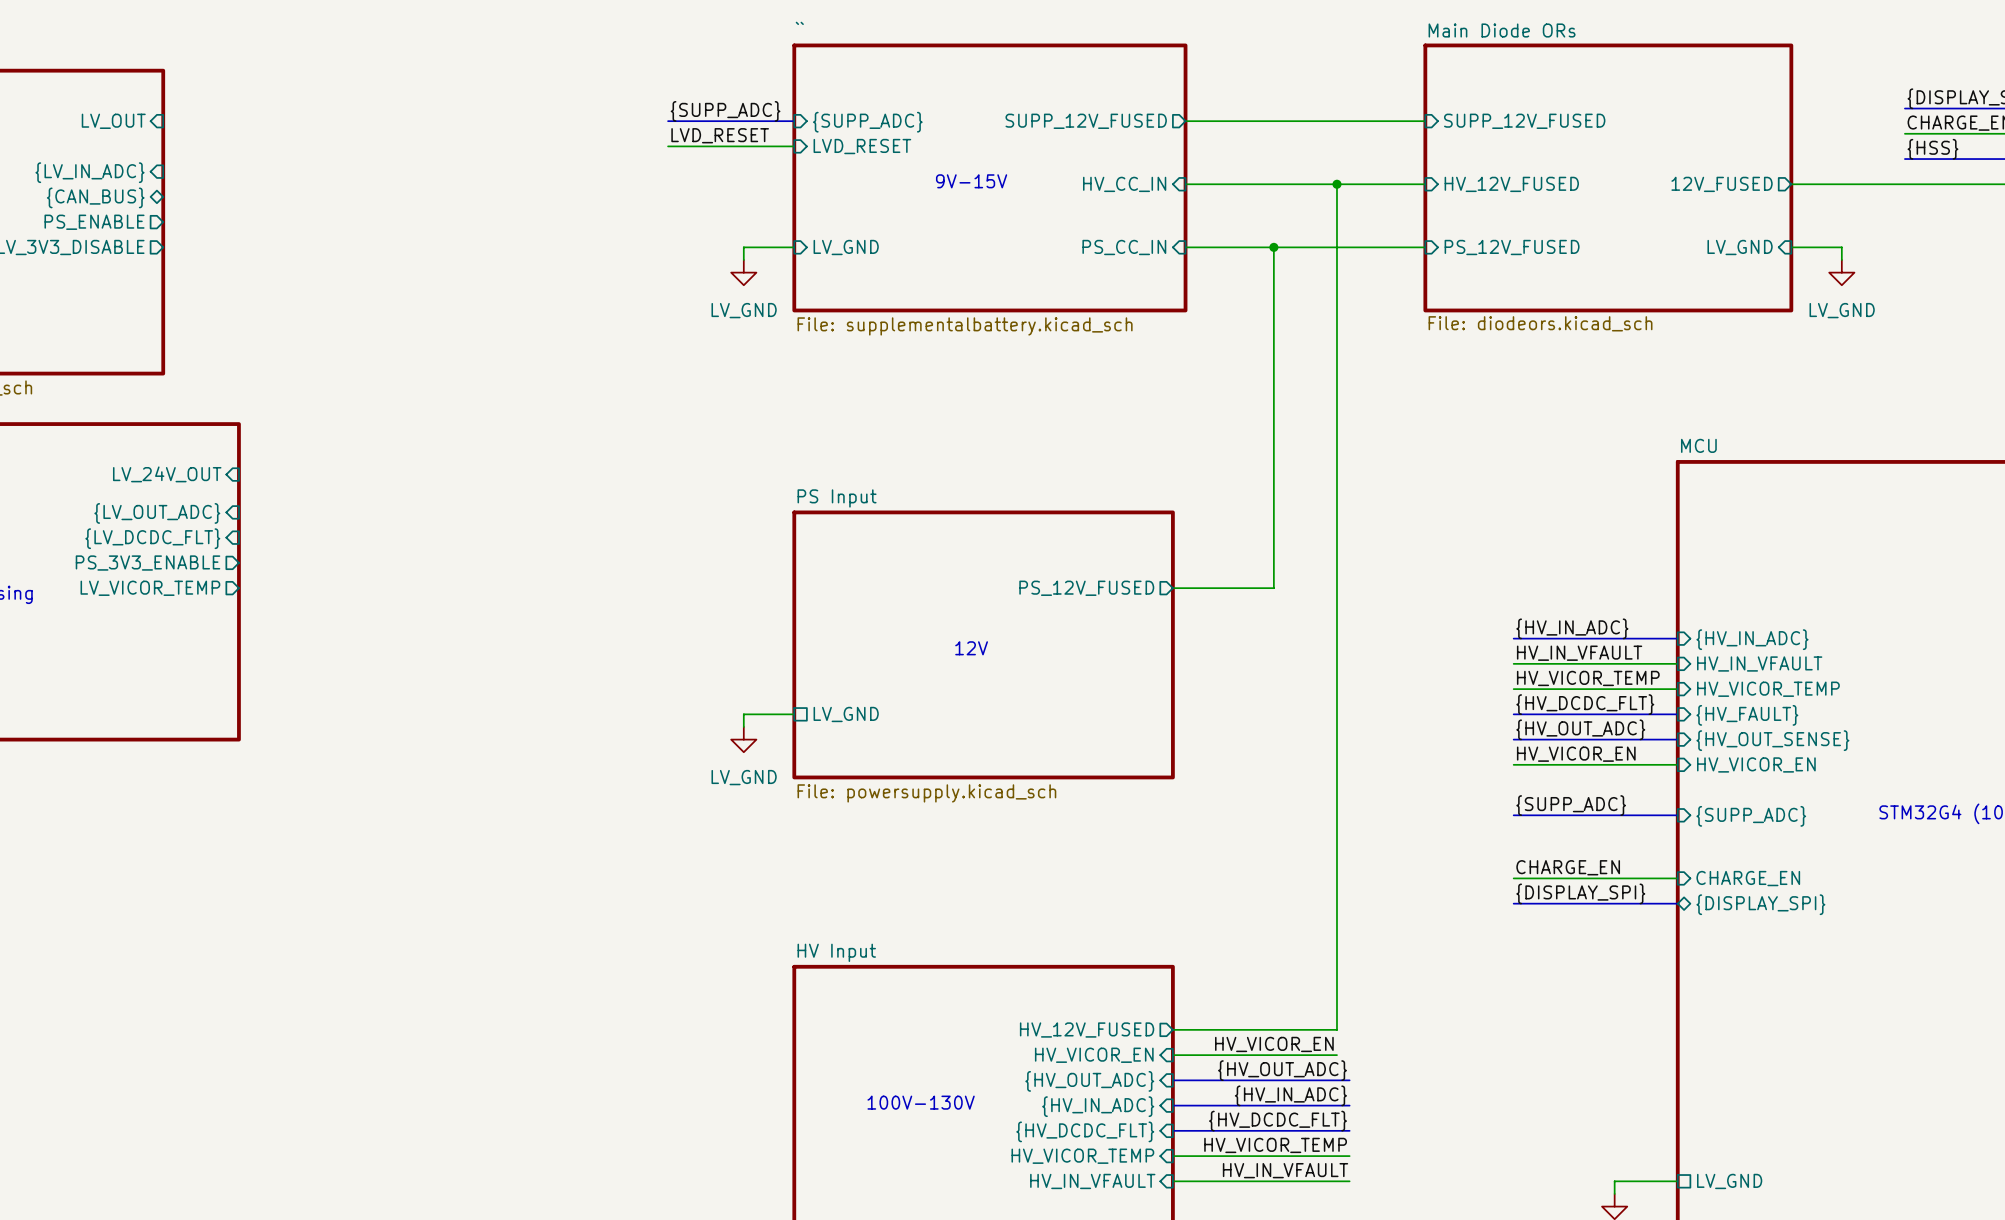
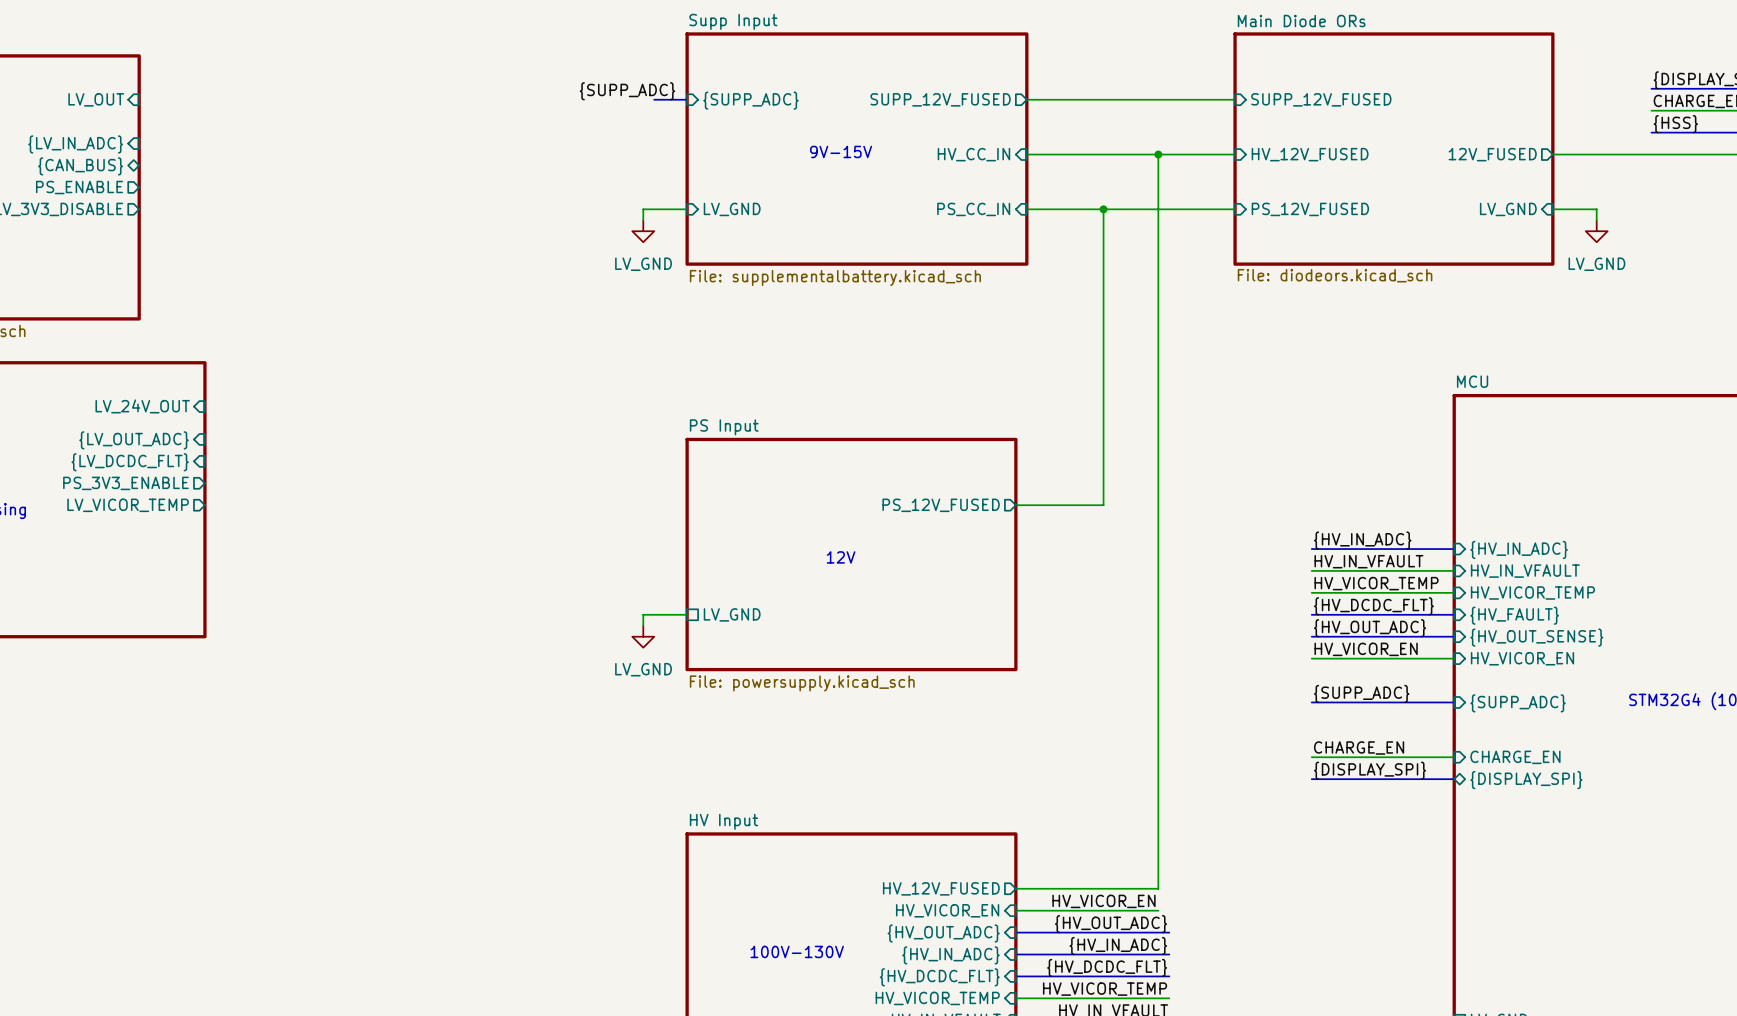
sheet Supp Input name: `` (799, 23) -> Supp Input (733, 21)
bus: (668, 121) (756, 121) -> none
label: LVD_RESET (720, 135) -> none
wire: (668, 146) (794, 146) -> none
sheet pin: LVD_RESET (862, 146) -> none

